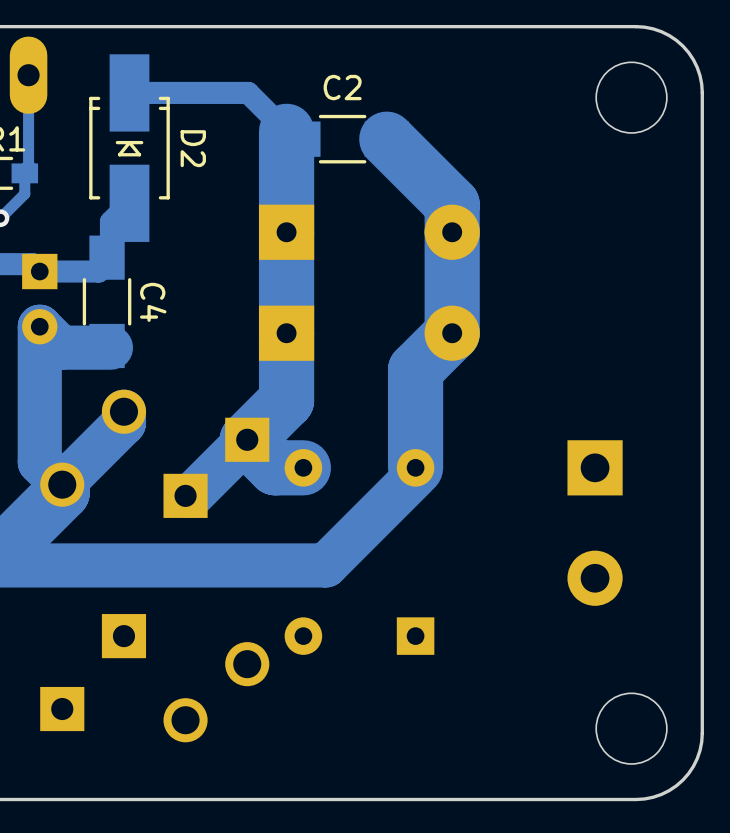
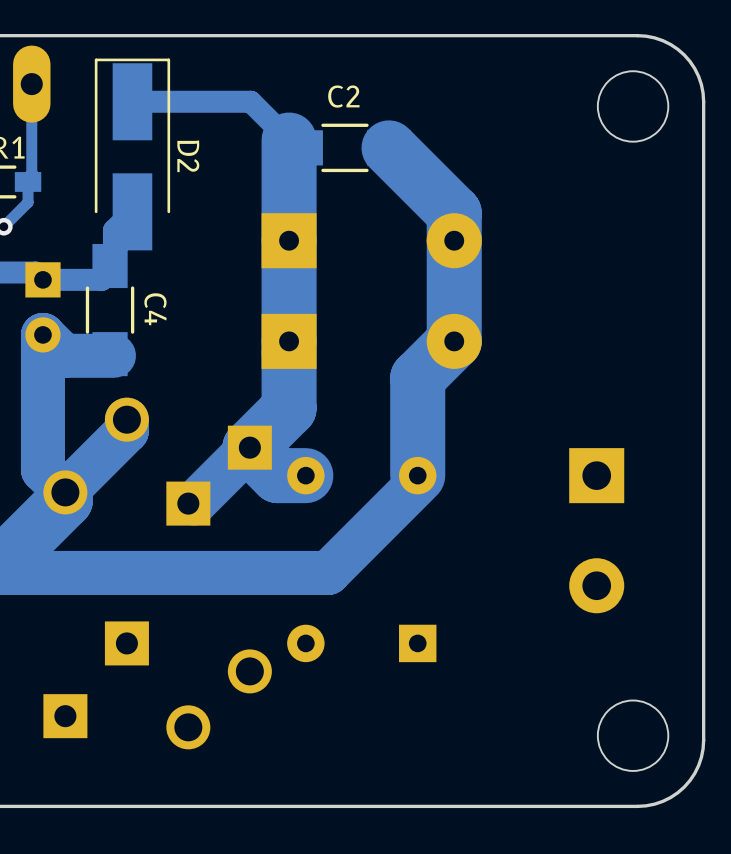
D2 footprint: [89, 54, 170, 242] -> [94, 58, 171, 251]

